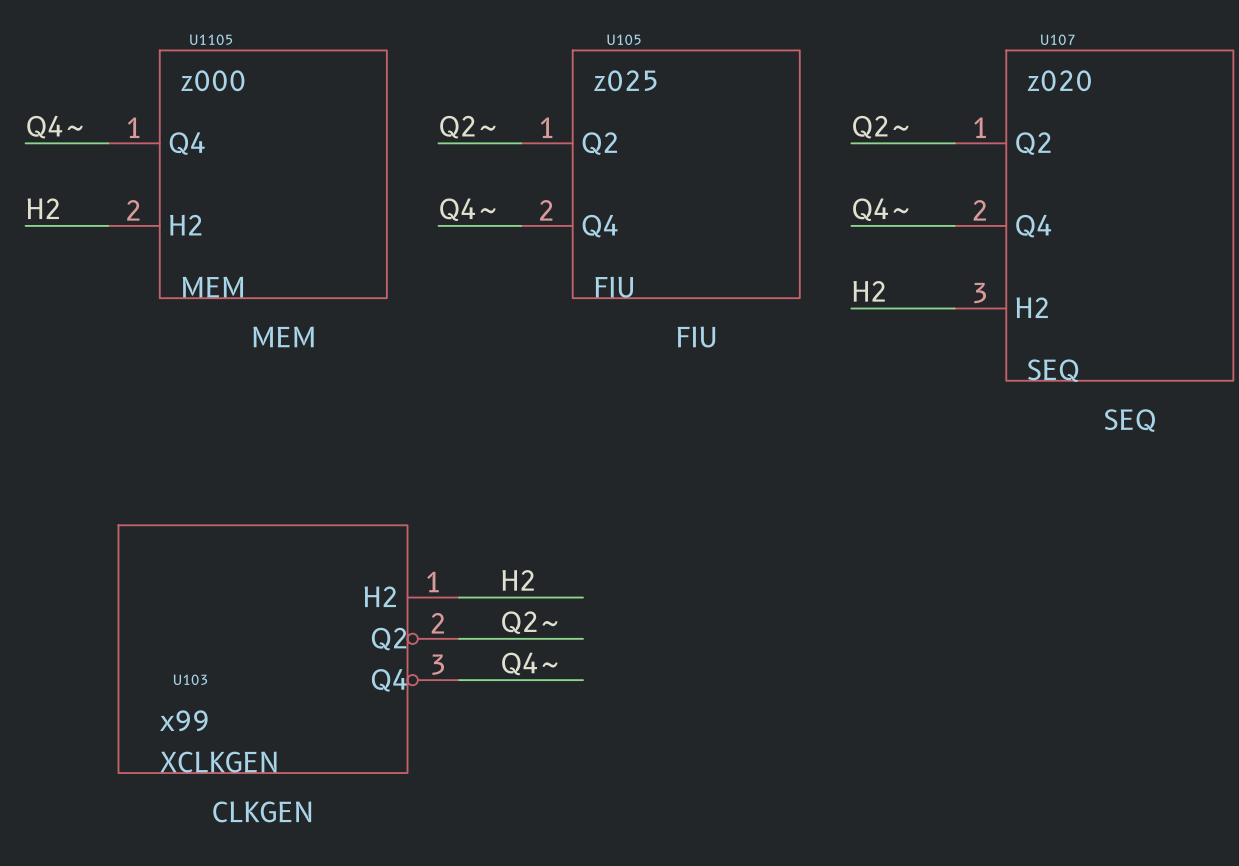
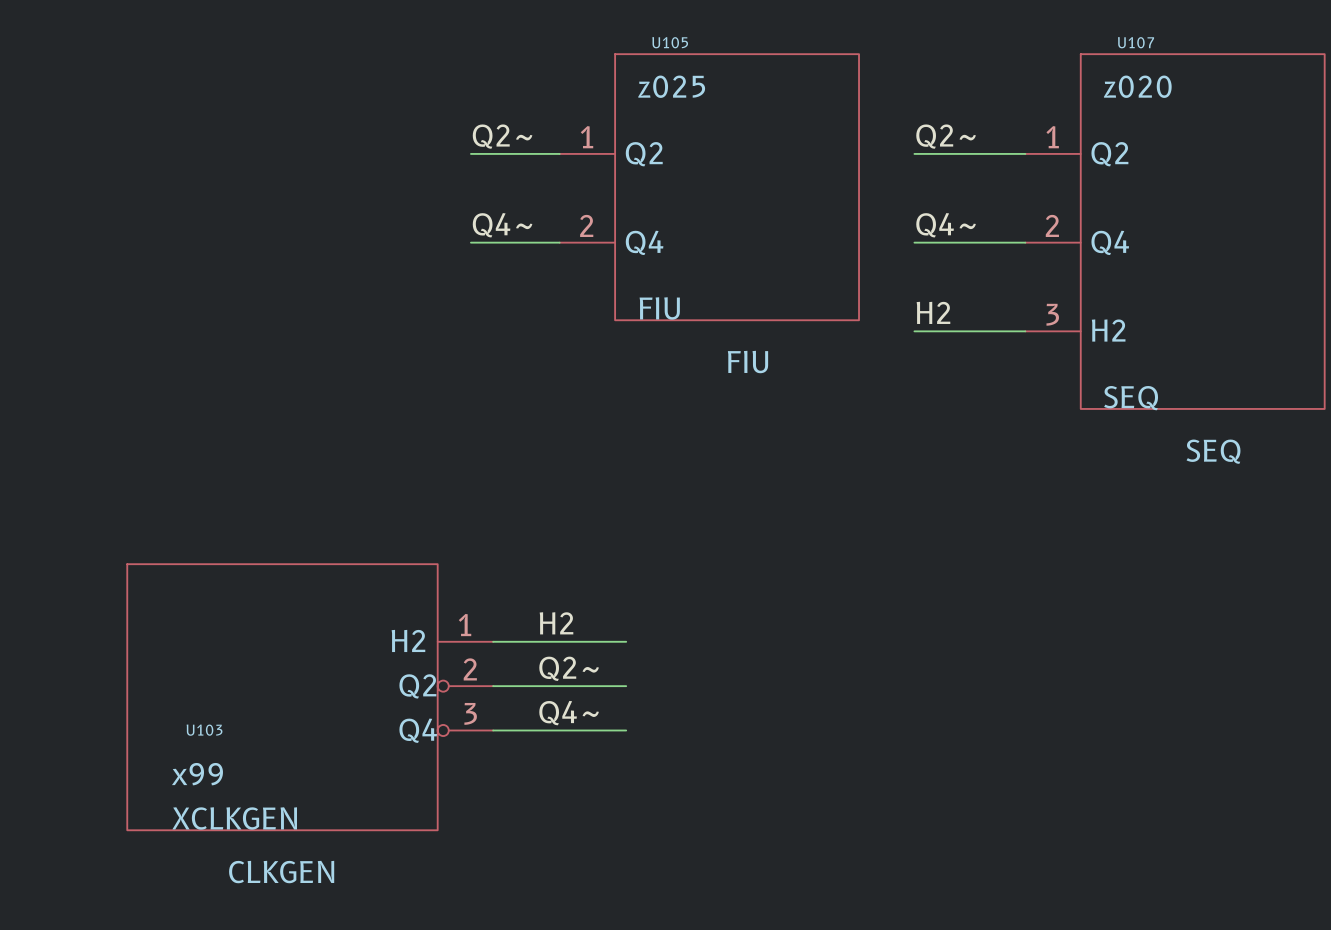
label: Q4~ (54, 127) -> none
wire: (25, 143) (108, 143) -> none
U1105: MEM (247, 174) -> none
label: H2 (43, 208) -> none
wire: (25, 225) (108, 225) -> none

